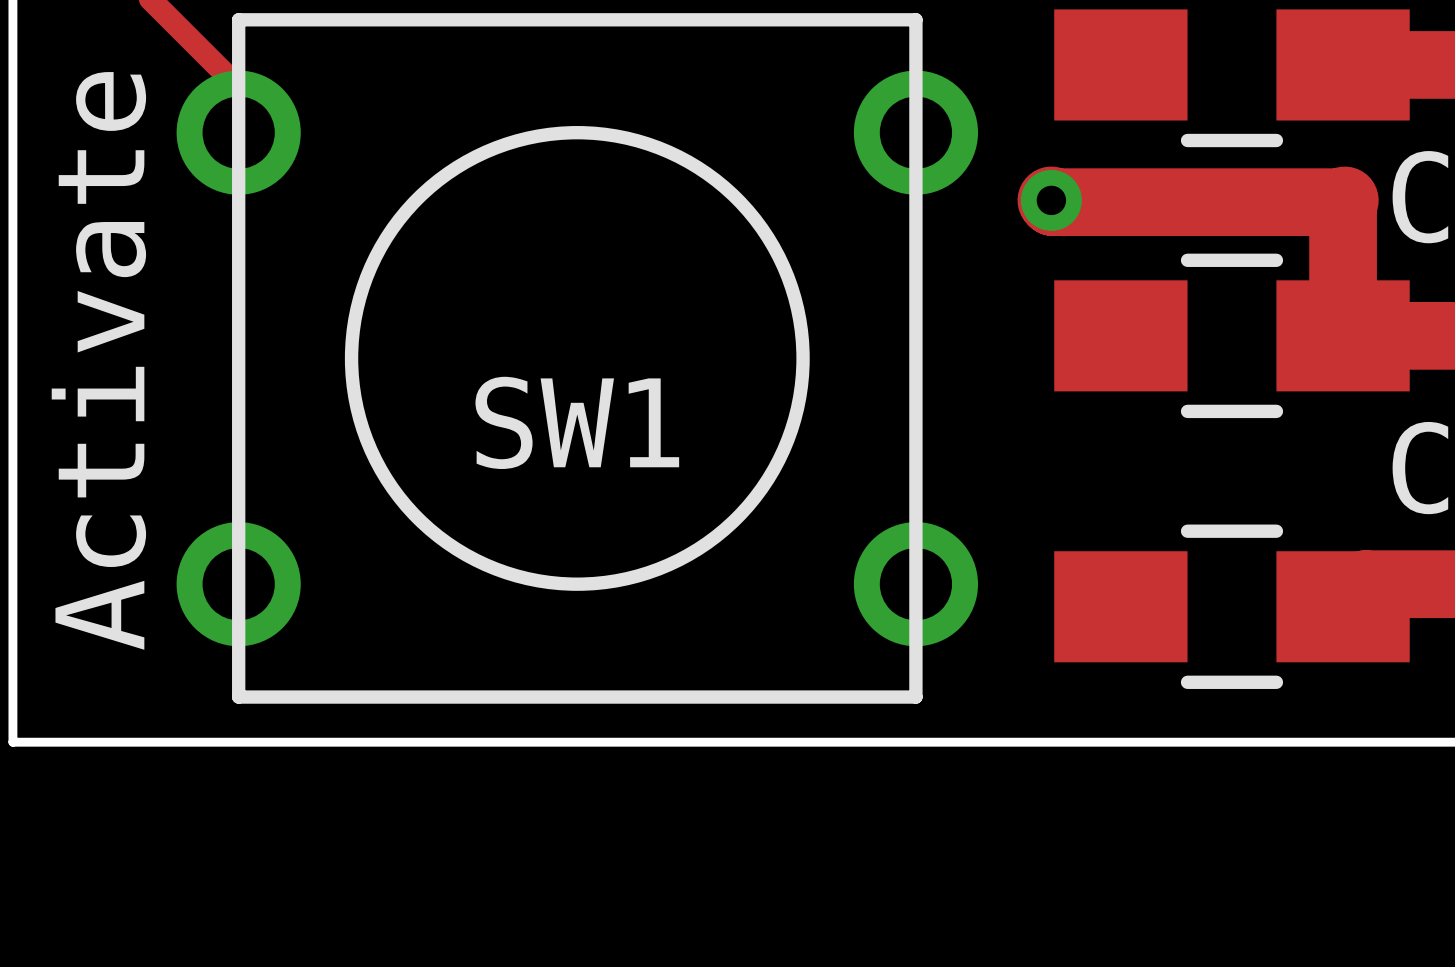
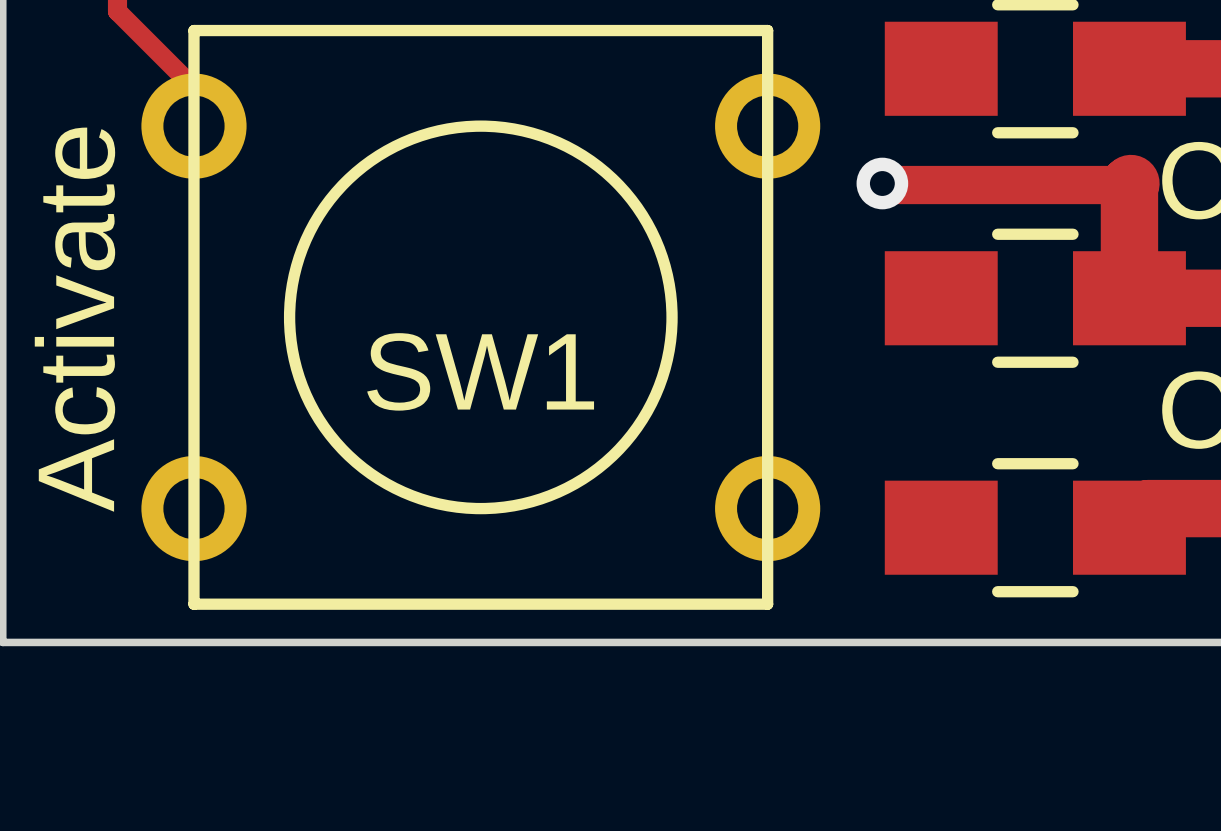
track width: thick (1051, 200) (1053, 202) (1343, 202) -> thin (882, 183) (1129, 185)

